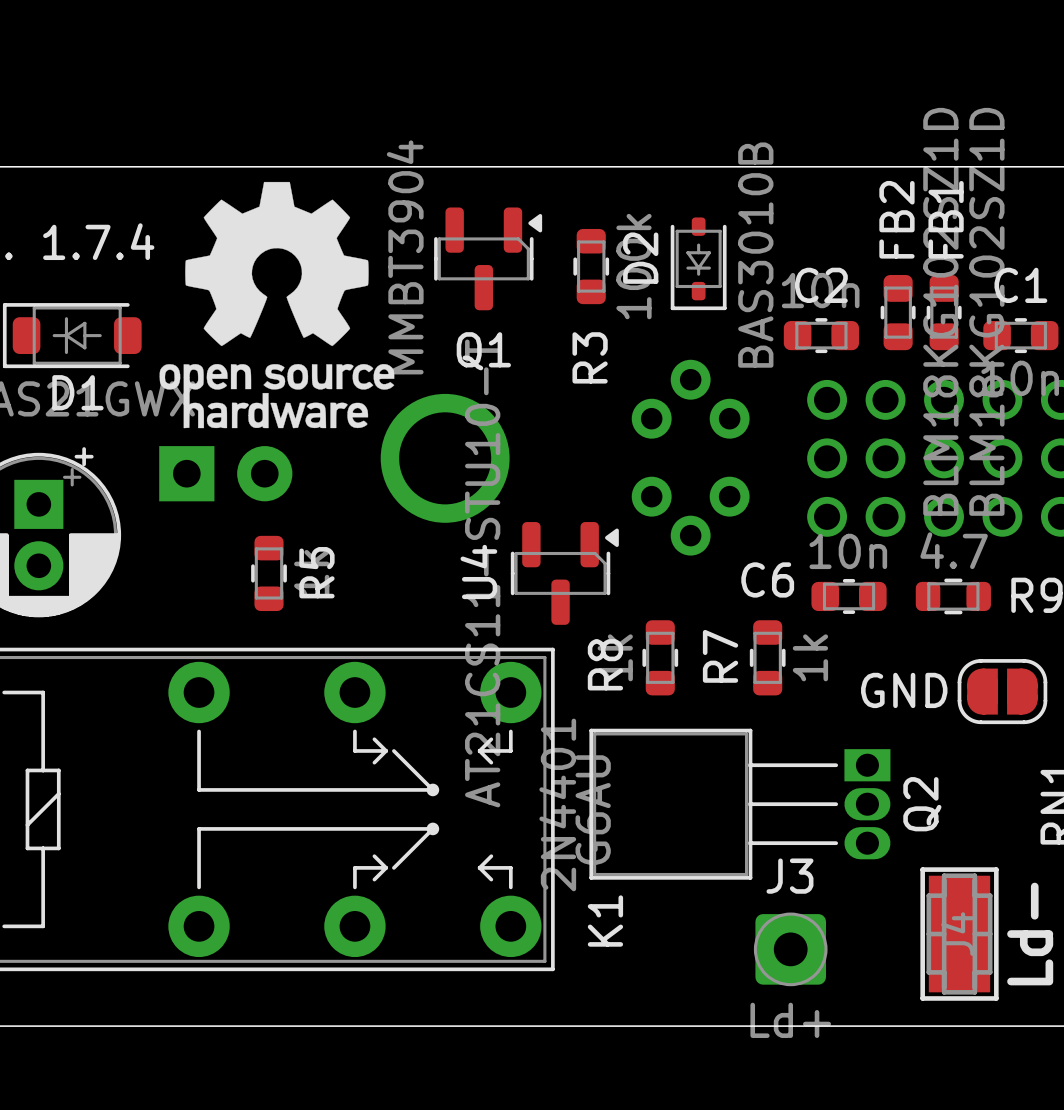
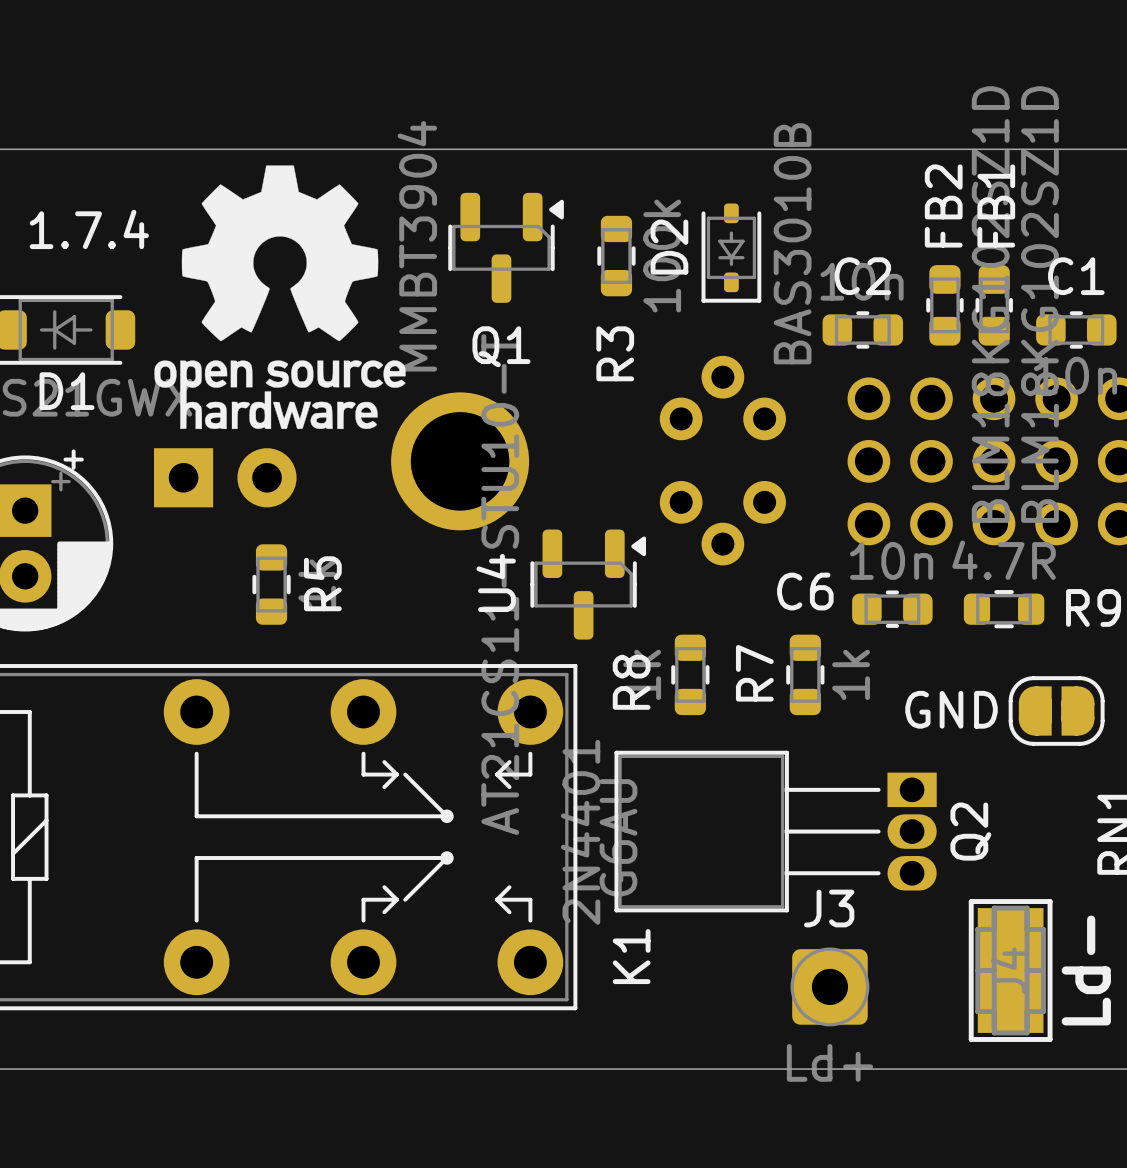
R9 value: 4.7 (954, 550) -> 4.7R (1004, 560)

